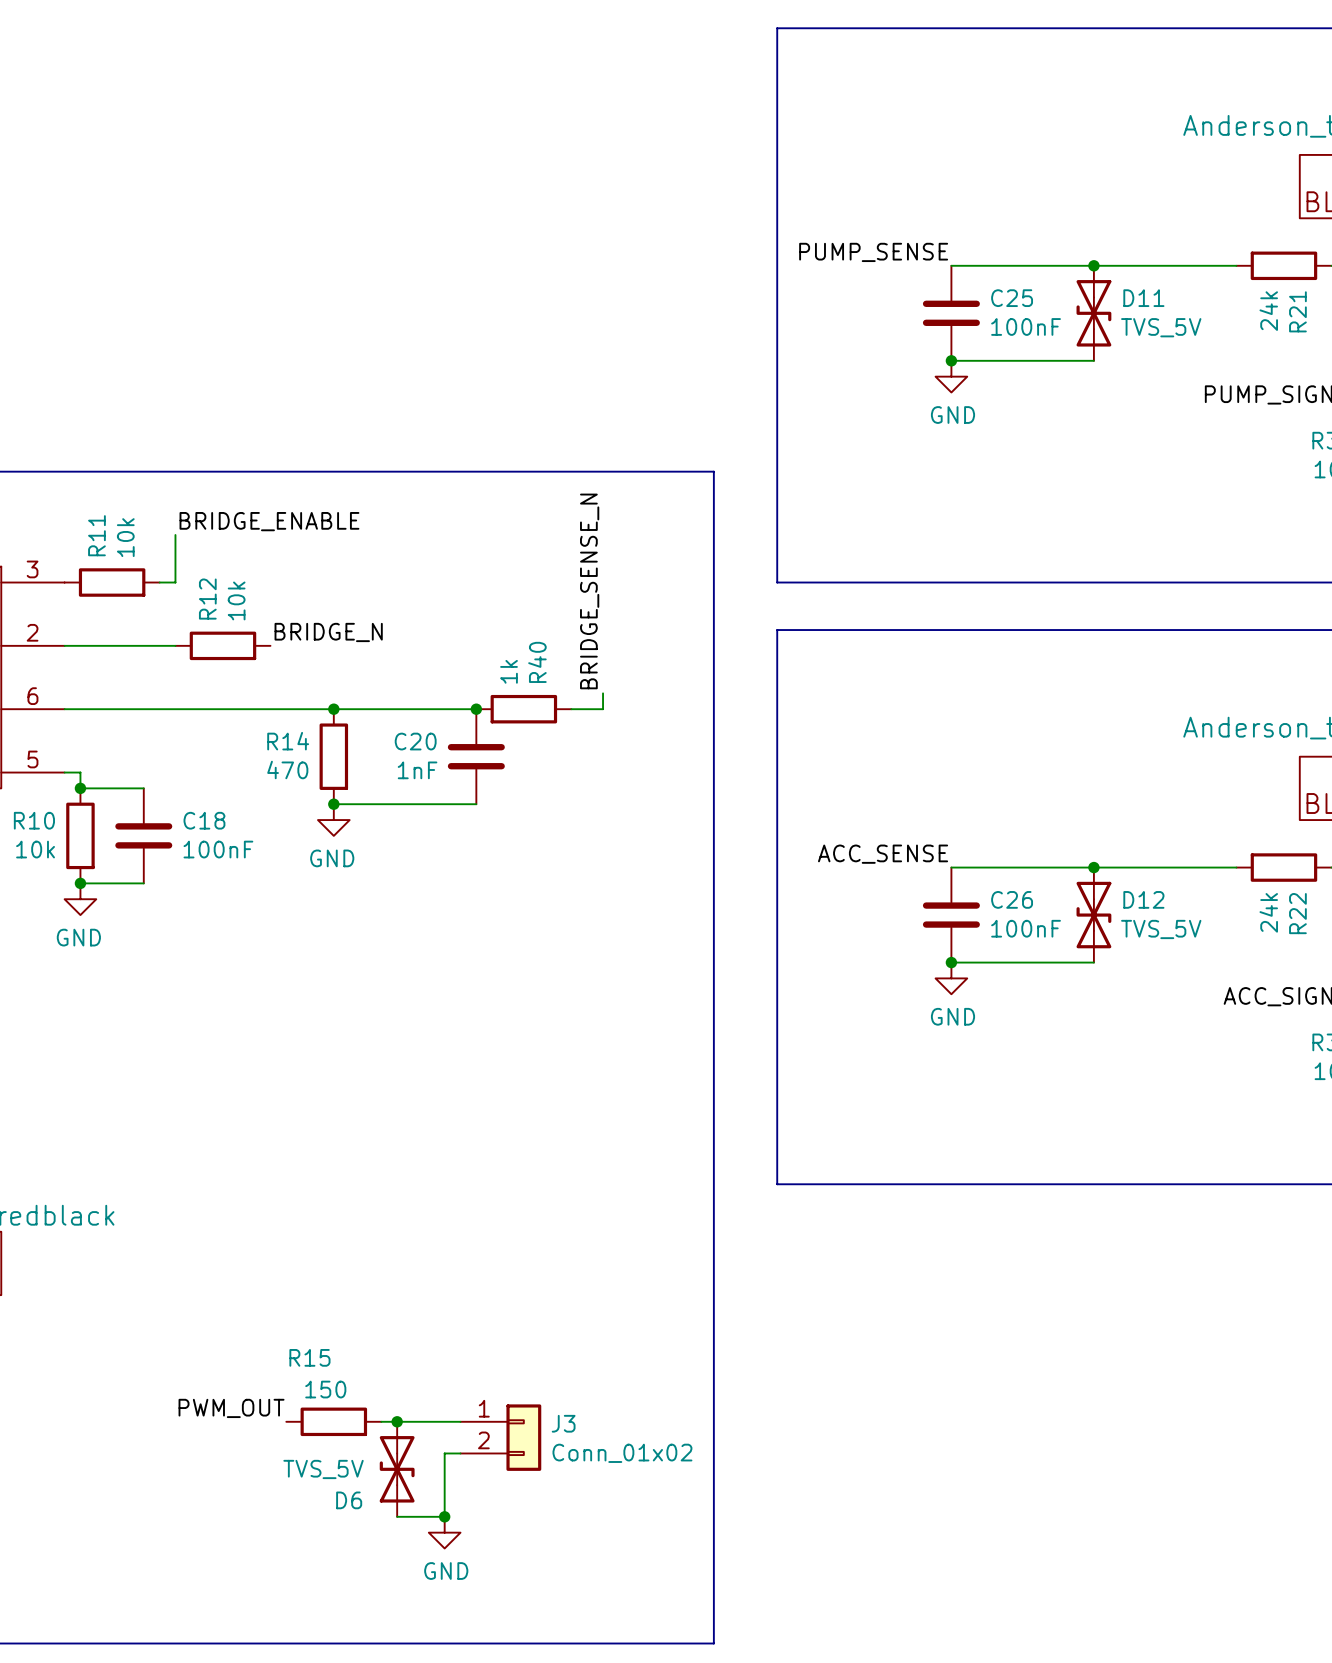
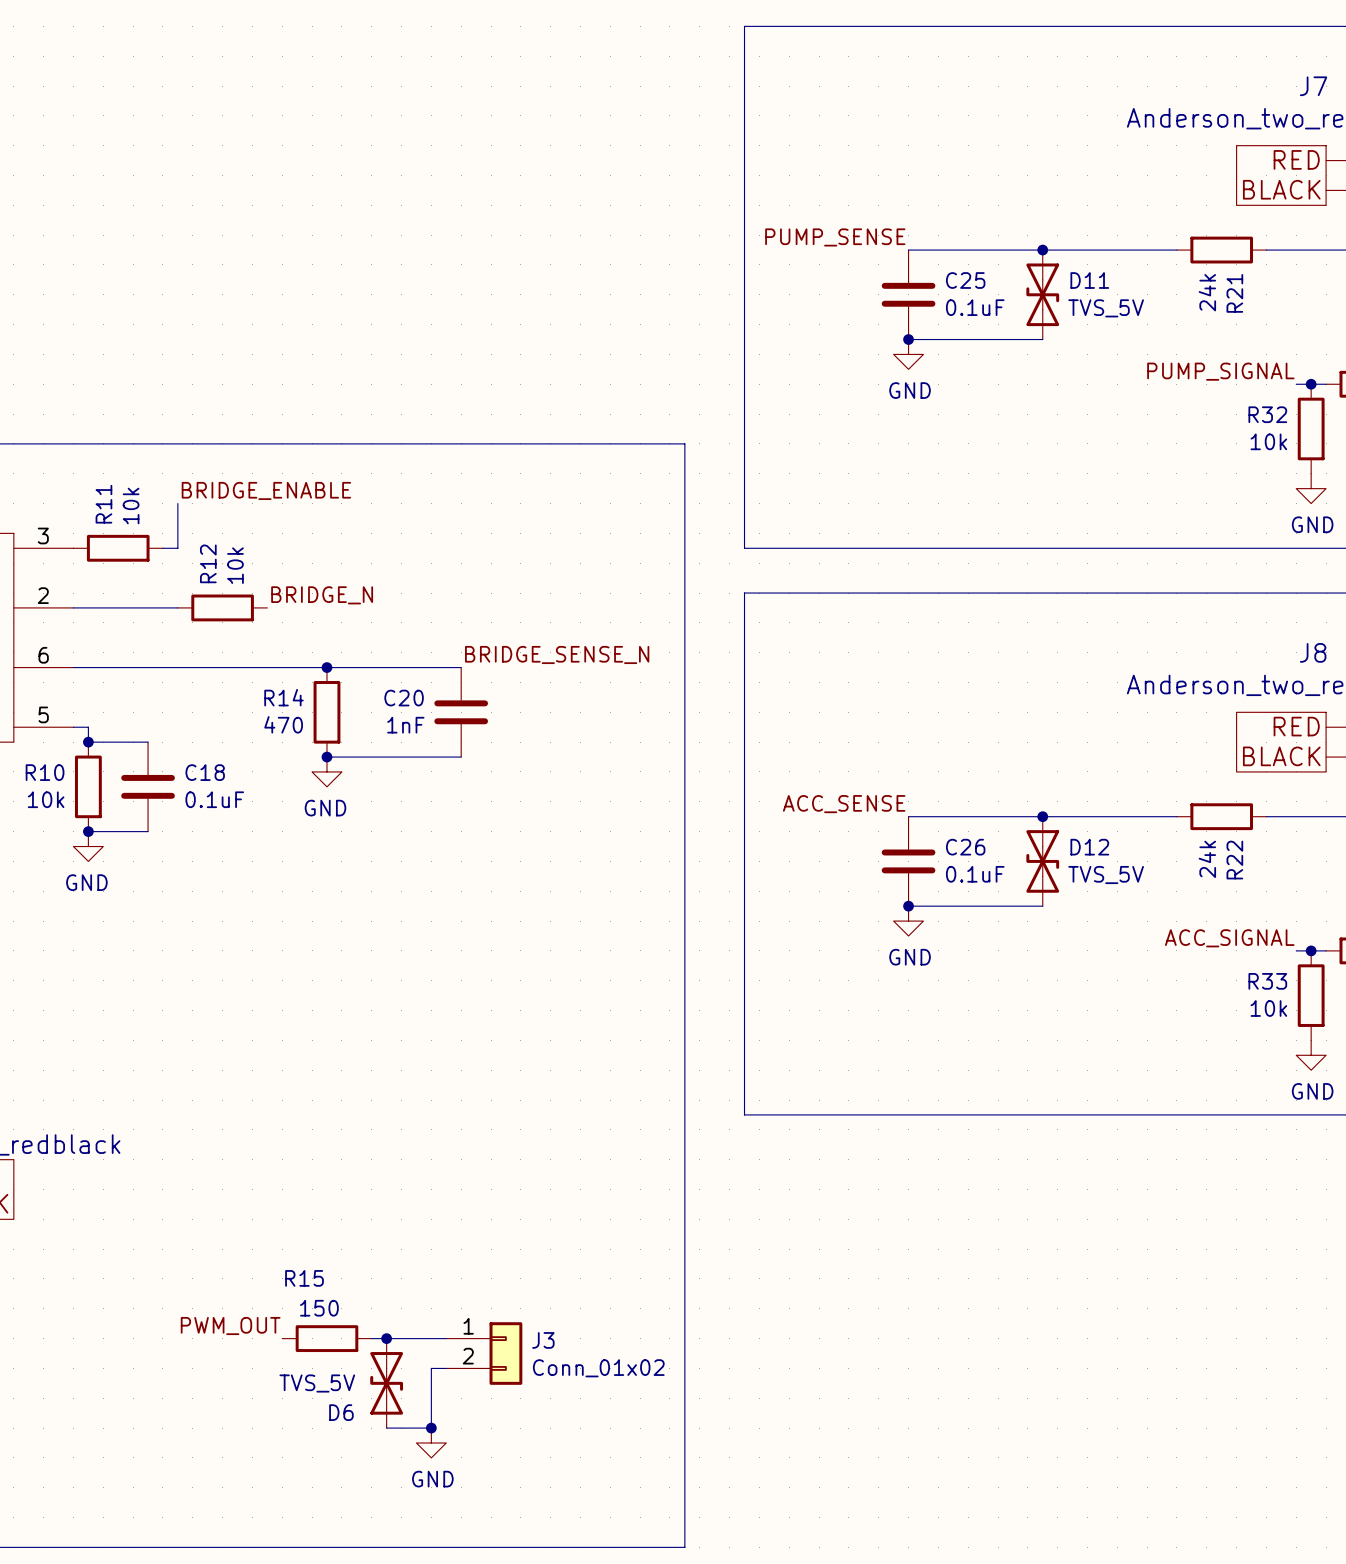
C25 value: 100nF (1026, 326) -> 0.1uF (975, 307)
label rotation: 0° (589, 591) -> 90° clockwise (557, 654)
wire: (603, 693) (603, 709) (571, 709) -> none
junction: (476, 709) -> none
R40: 1k (523, 709) -> none
C18 value: 100nF (218, 849) -> 0.1uF (214, 799)
C26 value: 100nF (1026, 928) -> 0.1uF (975, 874)

